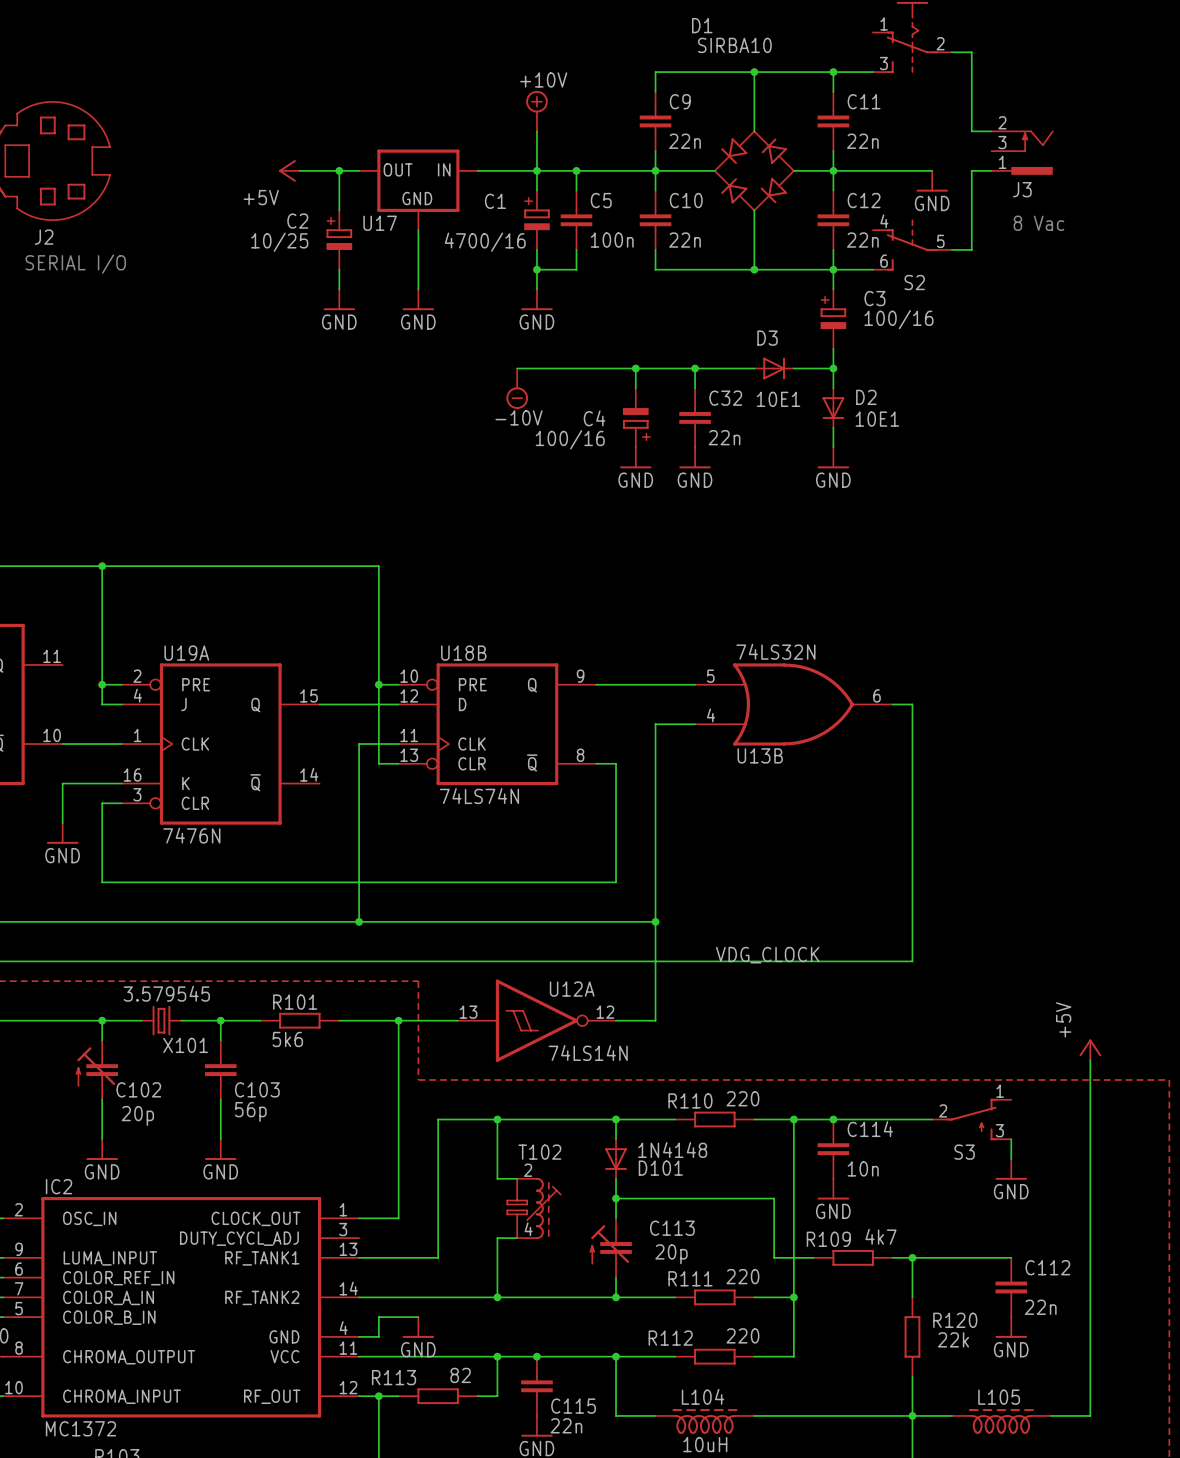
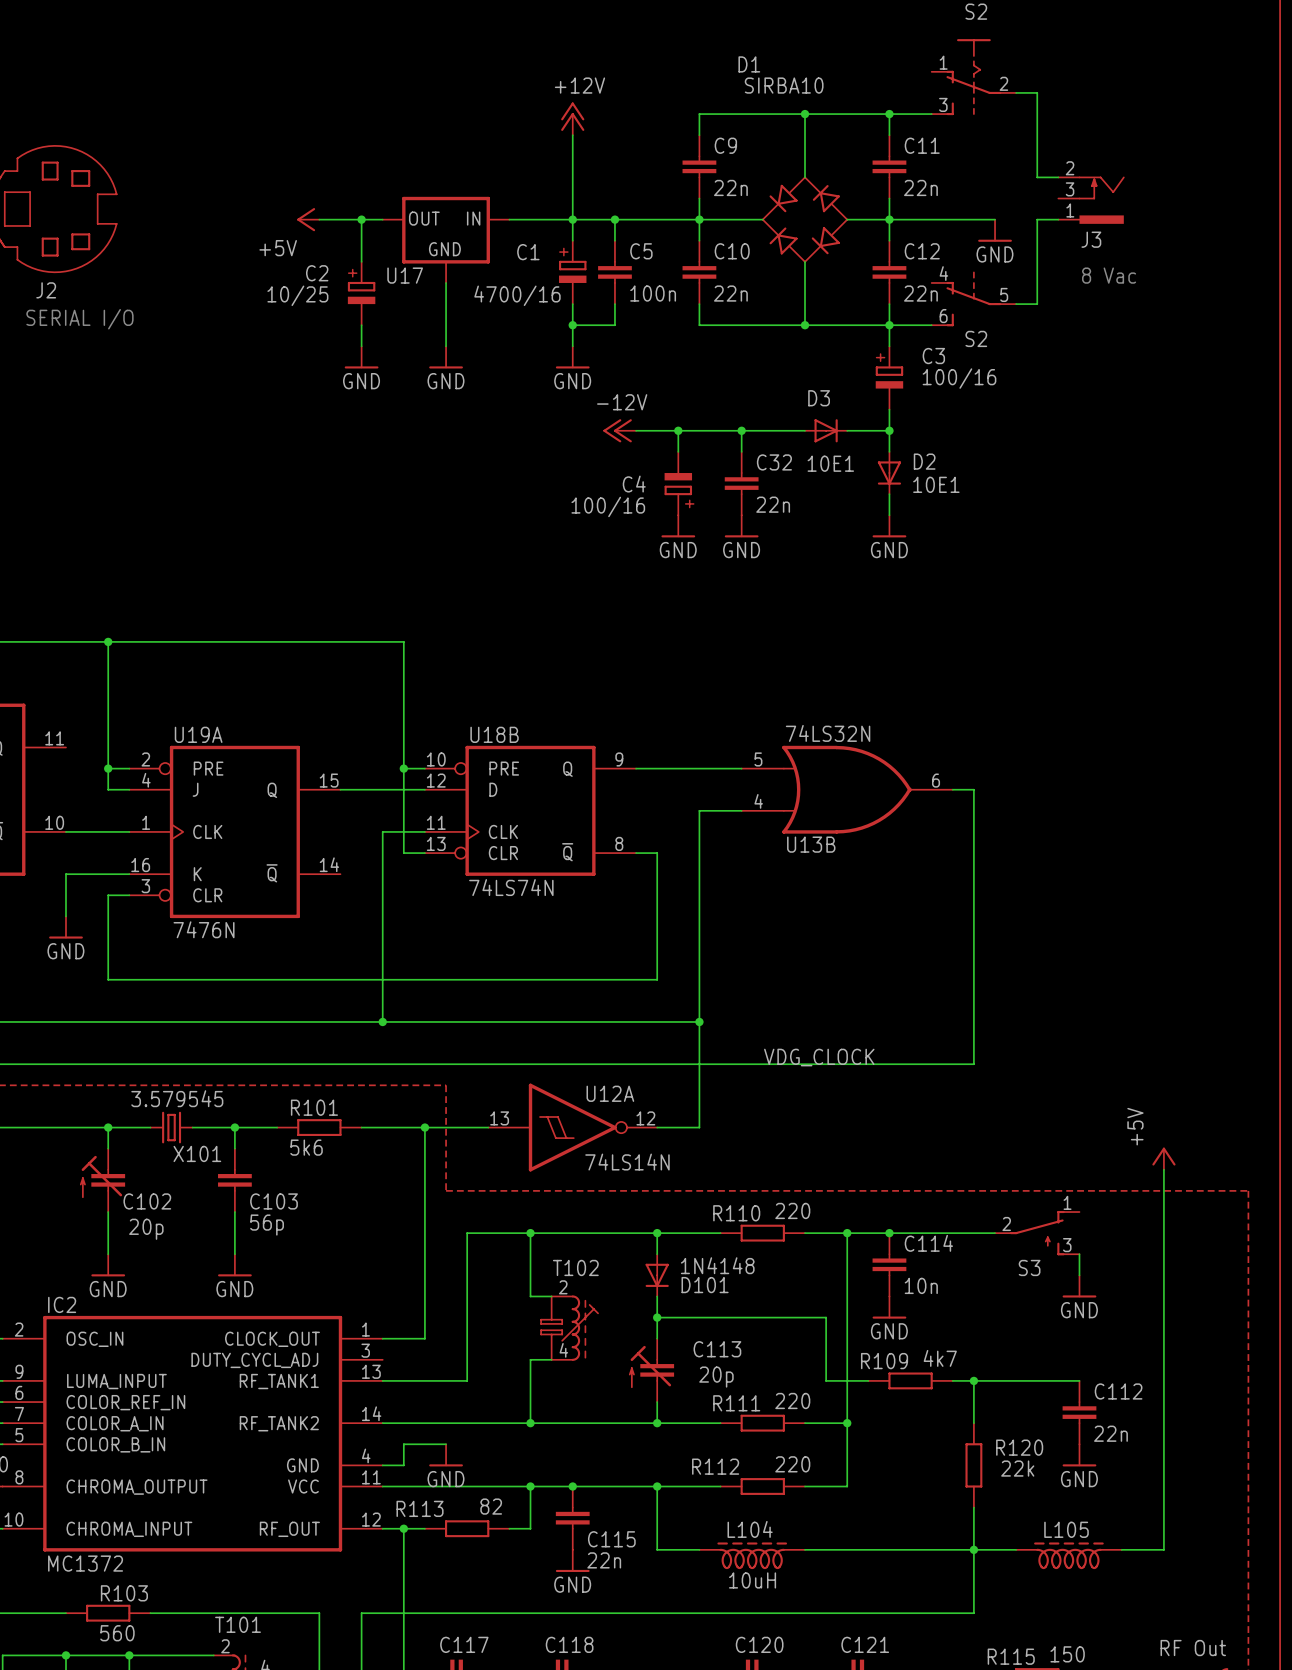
power symbol: none -> +12V (572, 118)
power symbol: +10V (536, 111) -> none
wire: (517, 368) (596, 368) -> none
power symbol: none -> -12V (619, 430)
power symbol: -10V (517, 388) -> none

